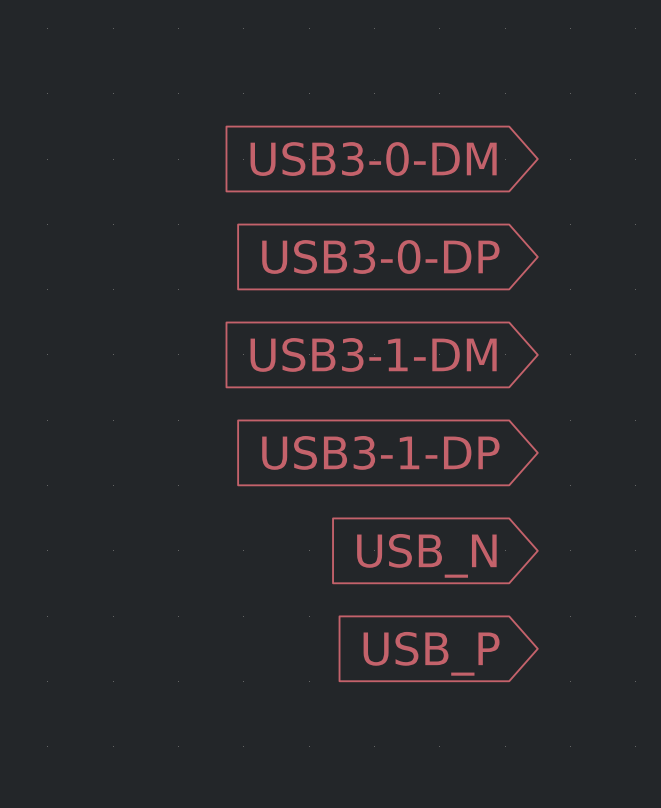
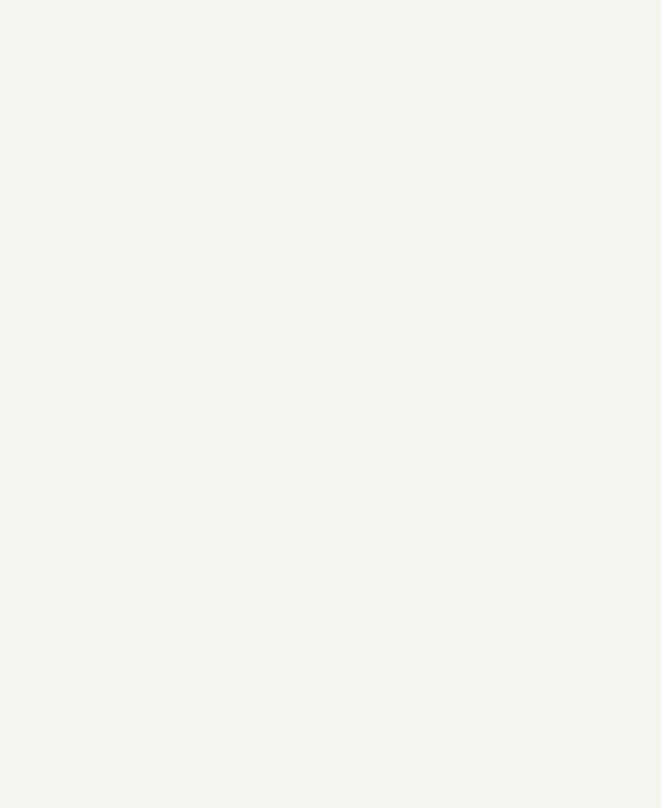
global label: USB3-0-DM (373, 159) -> none
global label: USB3-0-DP (380, 256) -> none
global label: USB3-1-DM (373, 354) -> none
global label: USB3-1-DP (380, 452) -> none
global label: USB_N (426, 555) -> none
global label: USB_P (431, 653) -> none

